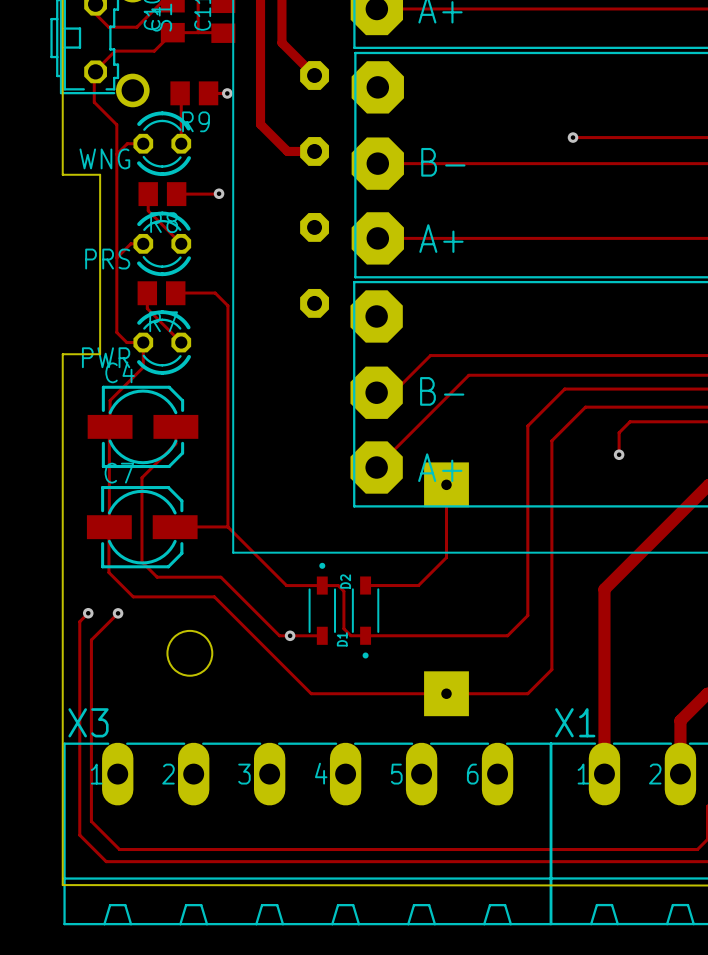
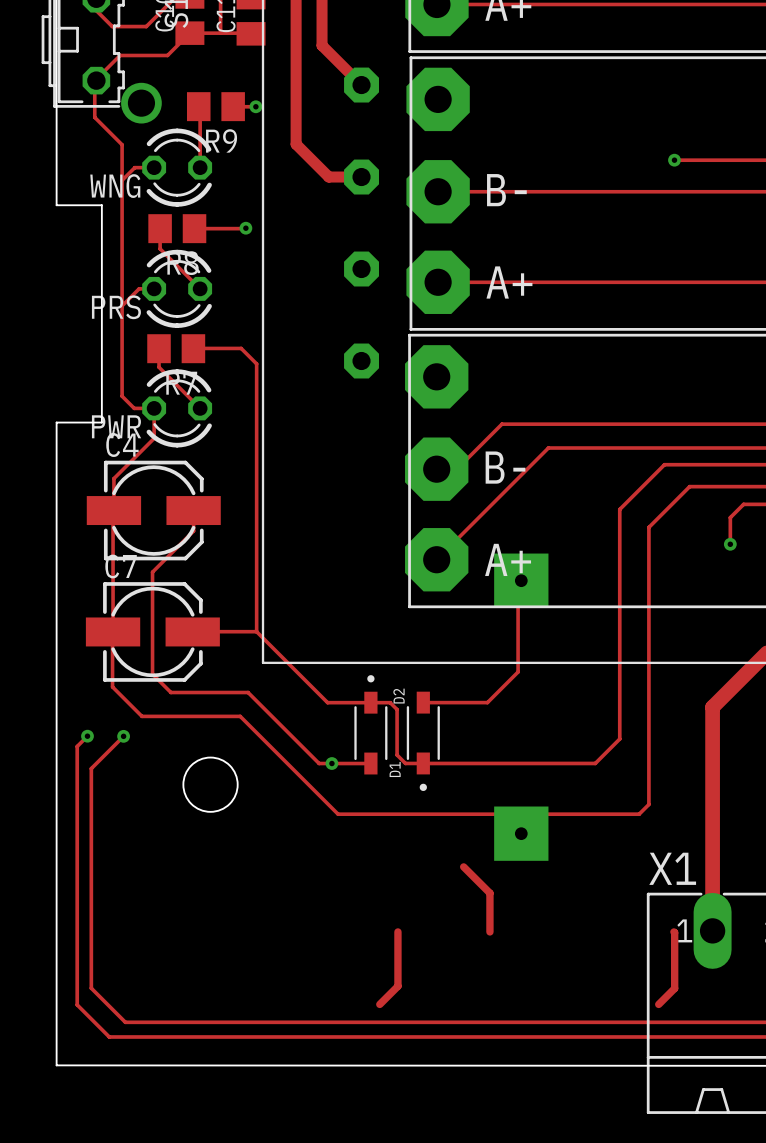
track: (446, 484) (446, 557) (443, 560) -> (518, 561) (518, 672)
track: (295, 677) (311, 693) (527, 693) (543, 677) -> (338, 814) (639, 814)
track: none -> (463, 866) (489, 893) (489, 931)
track: none -> (397, 931) (397, 986) (379, 1004)
track: none -> (673, 931) (674, 988) (658, 1004)
X3: (307, 833) -> none

